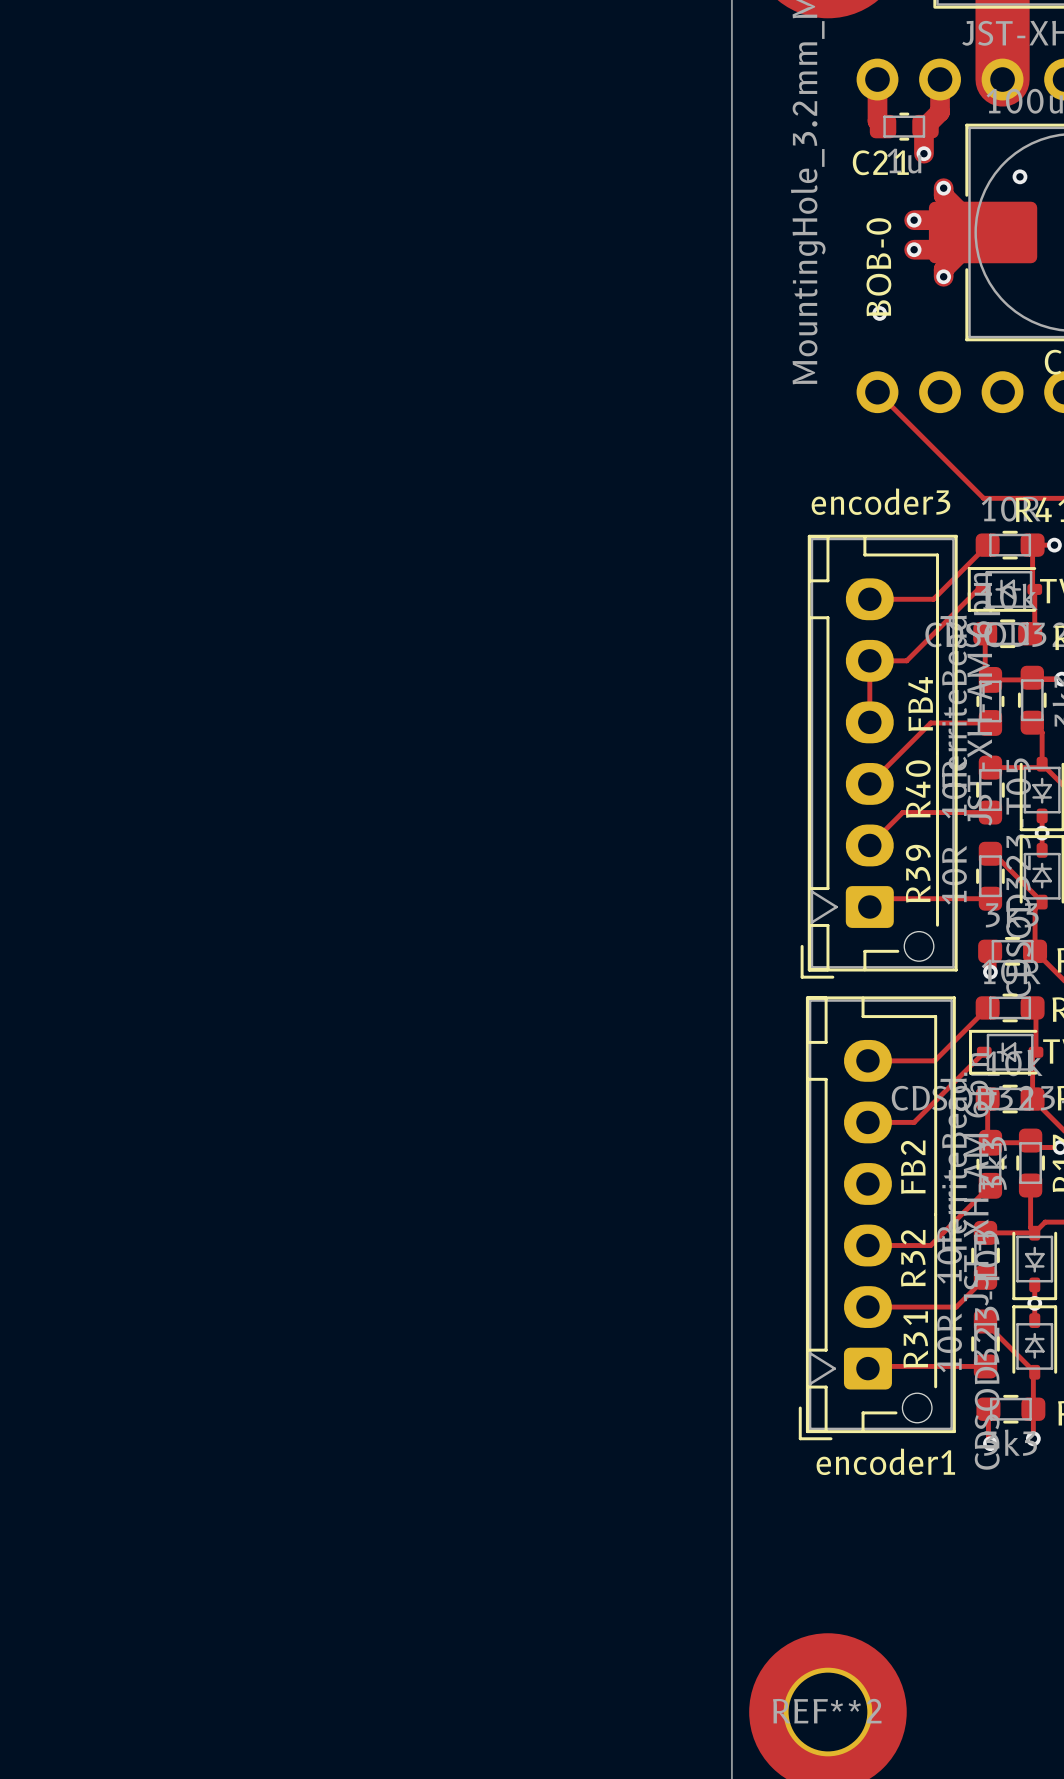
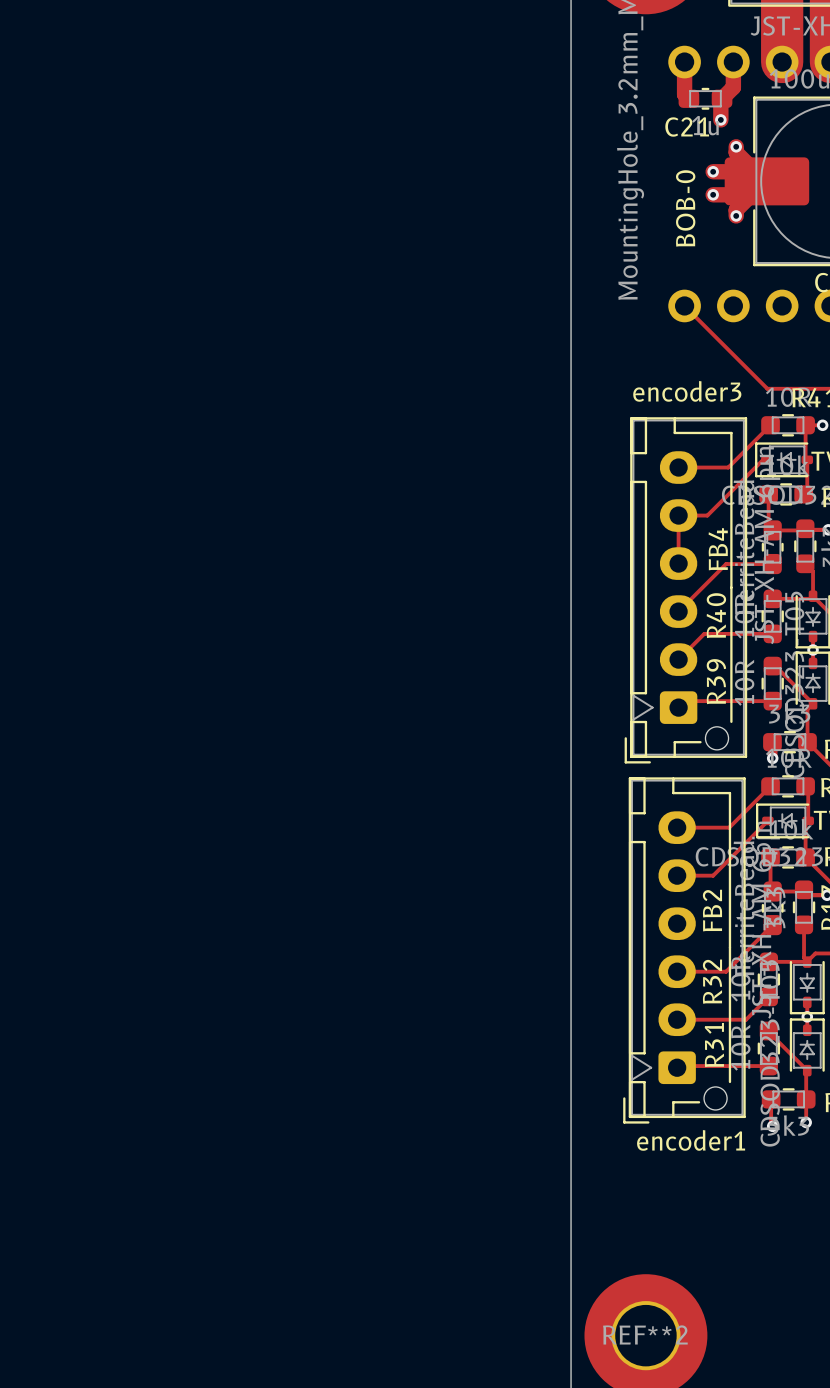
via: (1019, 176) -> none
via: (879, 313) -> none

